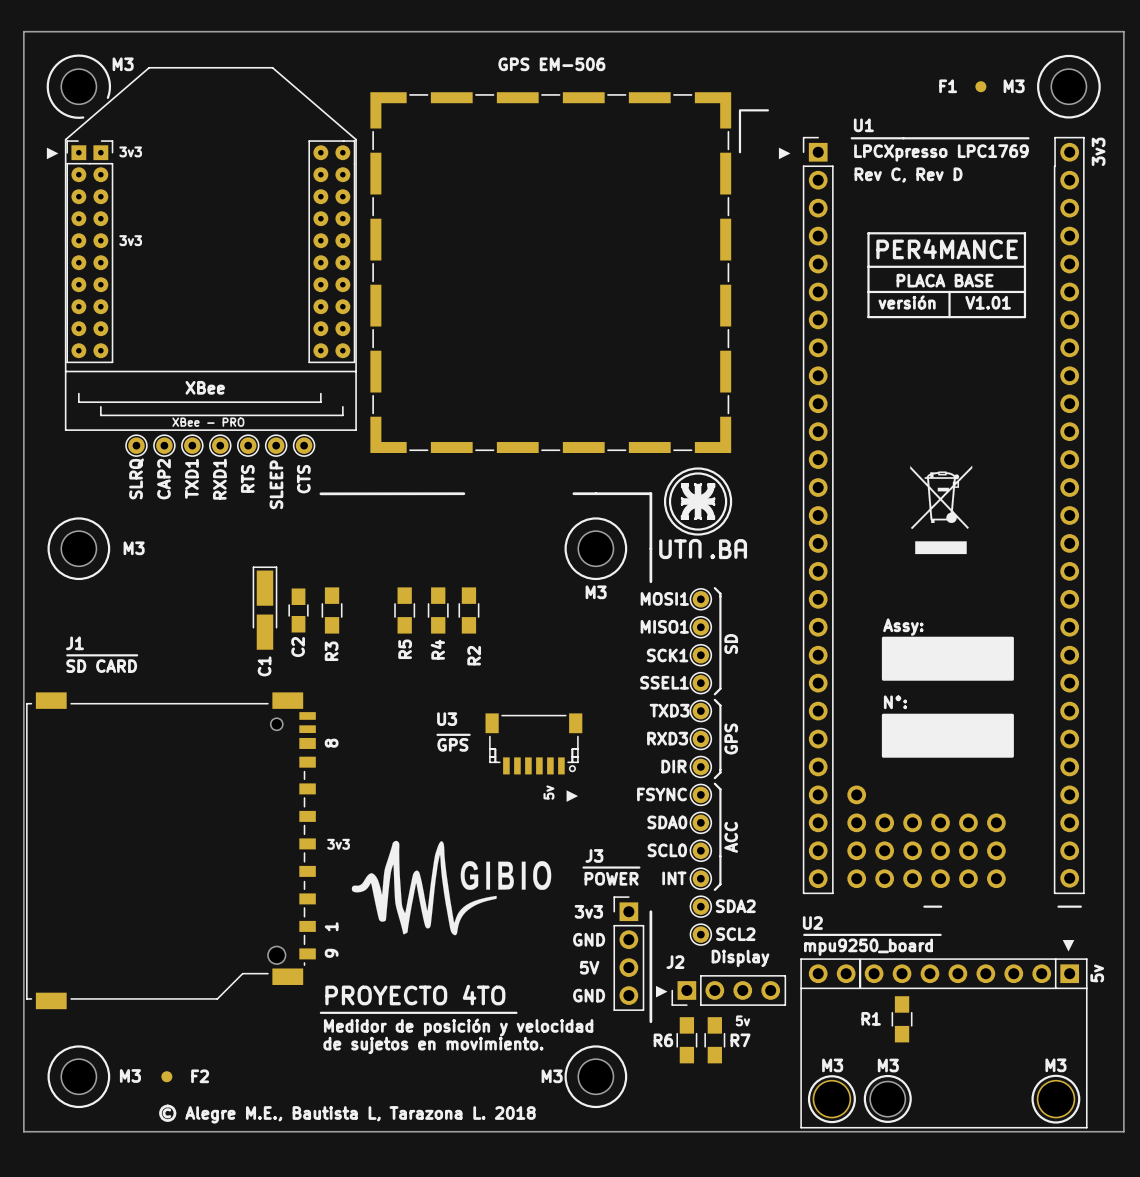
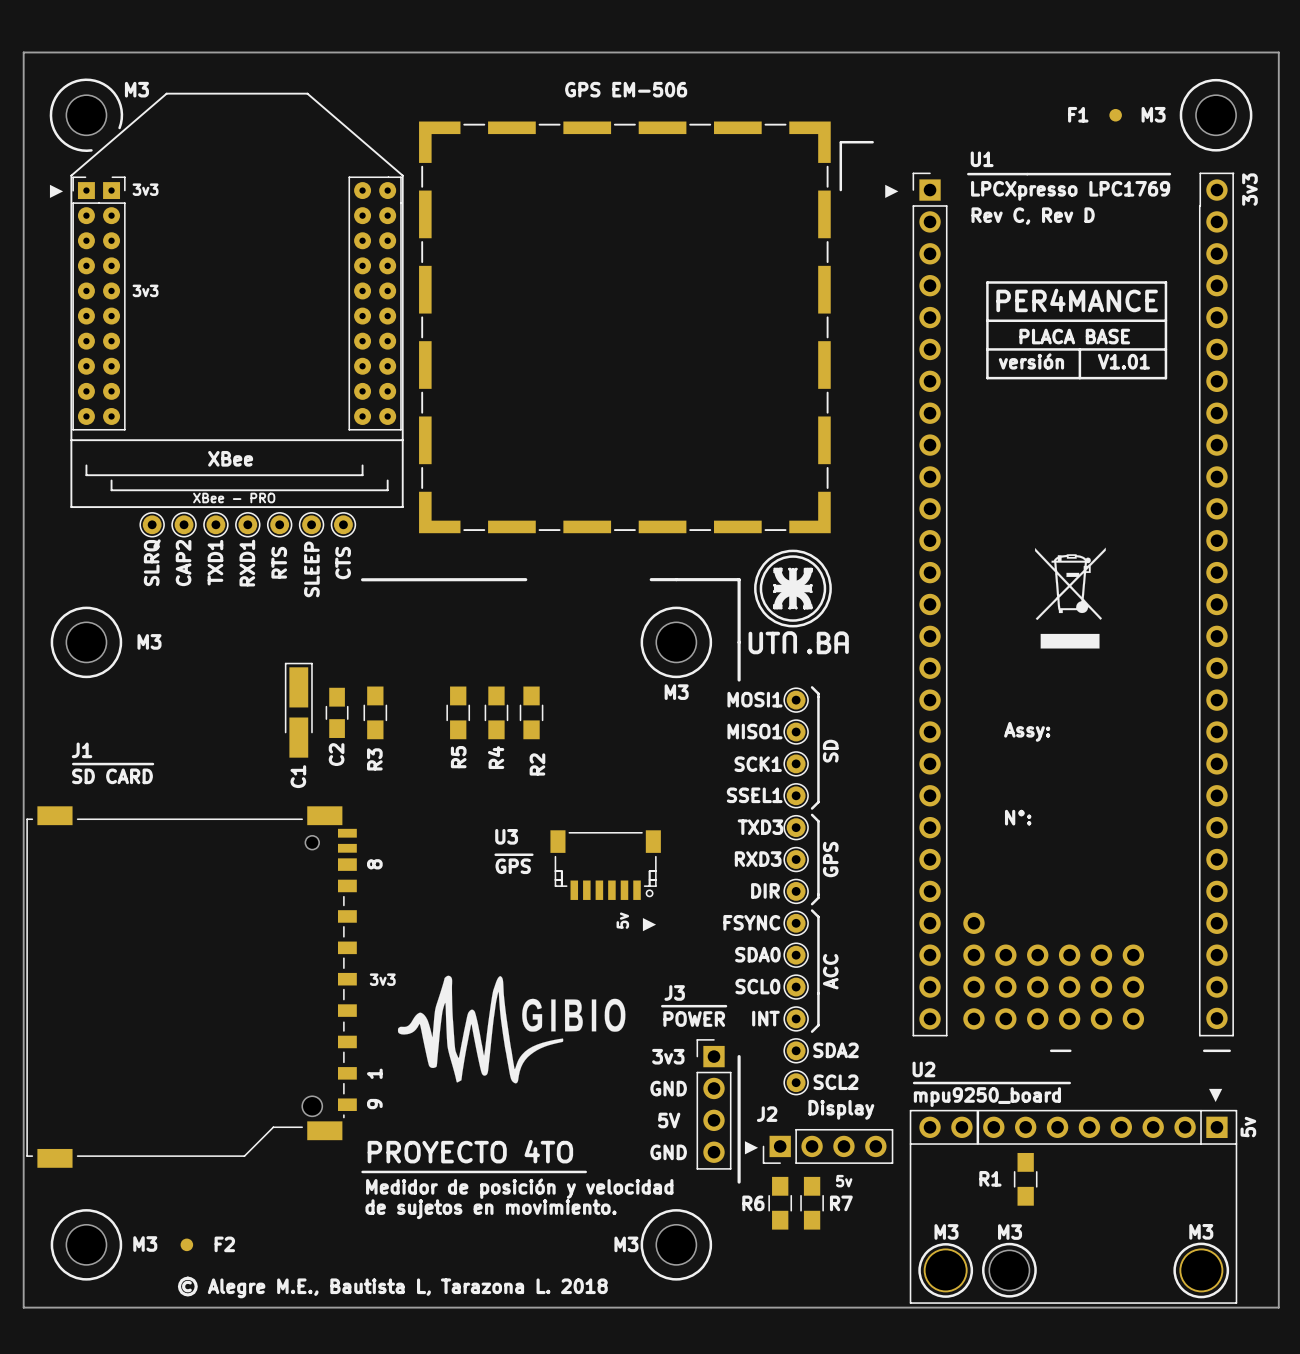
drawing: [881, 636, 1014, 681] -> none
drawing: [881, 713, 1014, 758] -> none

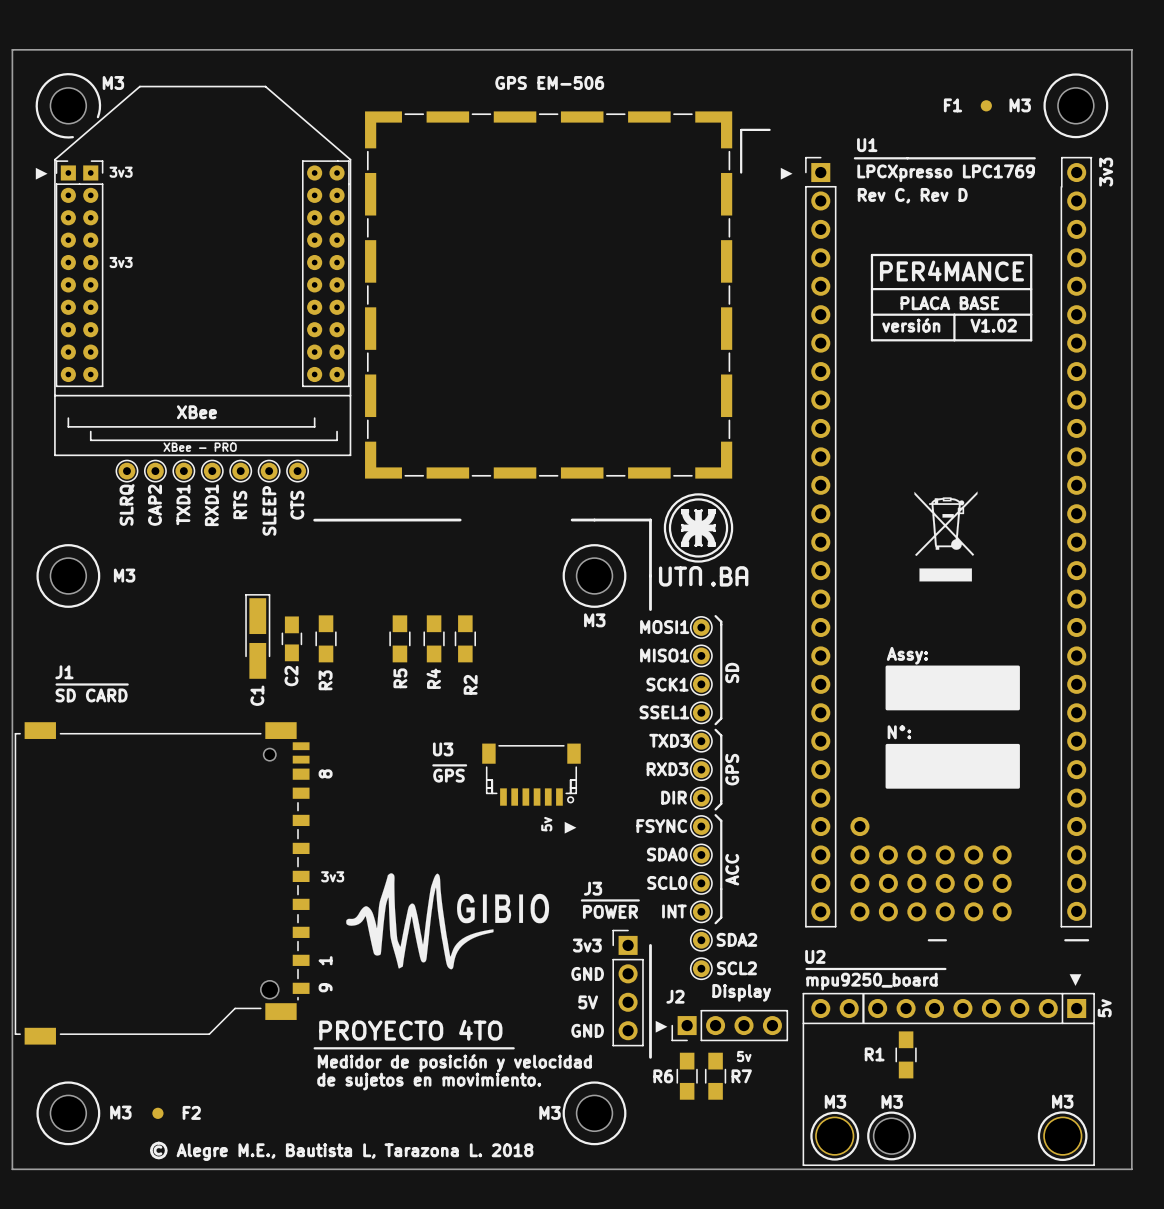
text: V1.01 (1123, 361) -> V1.02 (993, 325)
drawing: none -> [885, 665, 1020, 711]
drawing: none -> [885, 743, 1020, 789]

